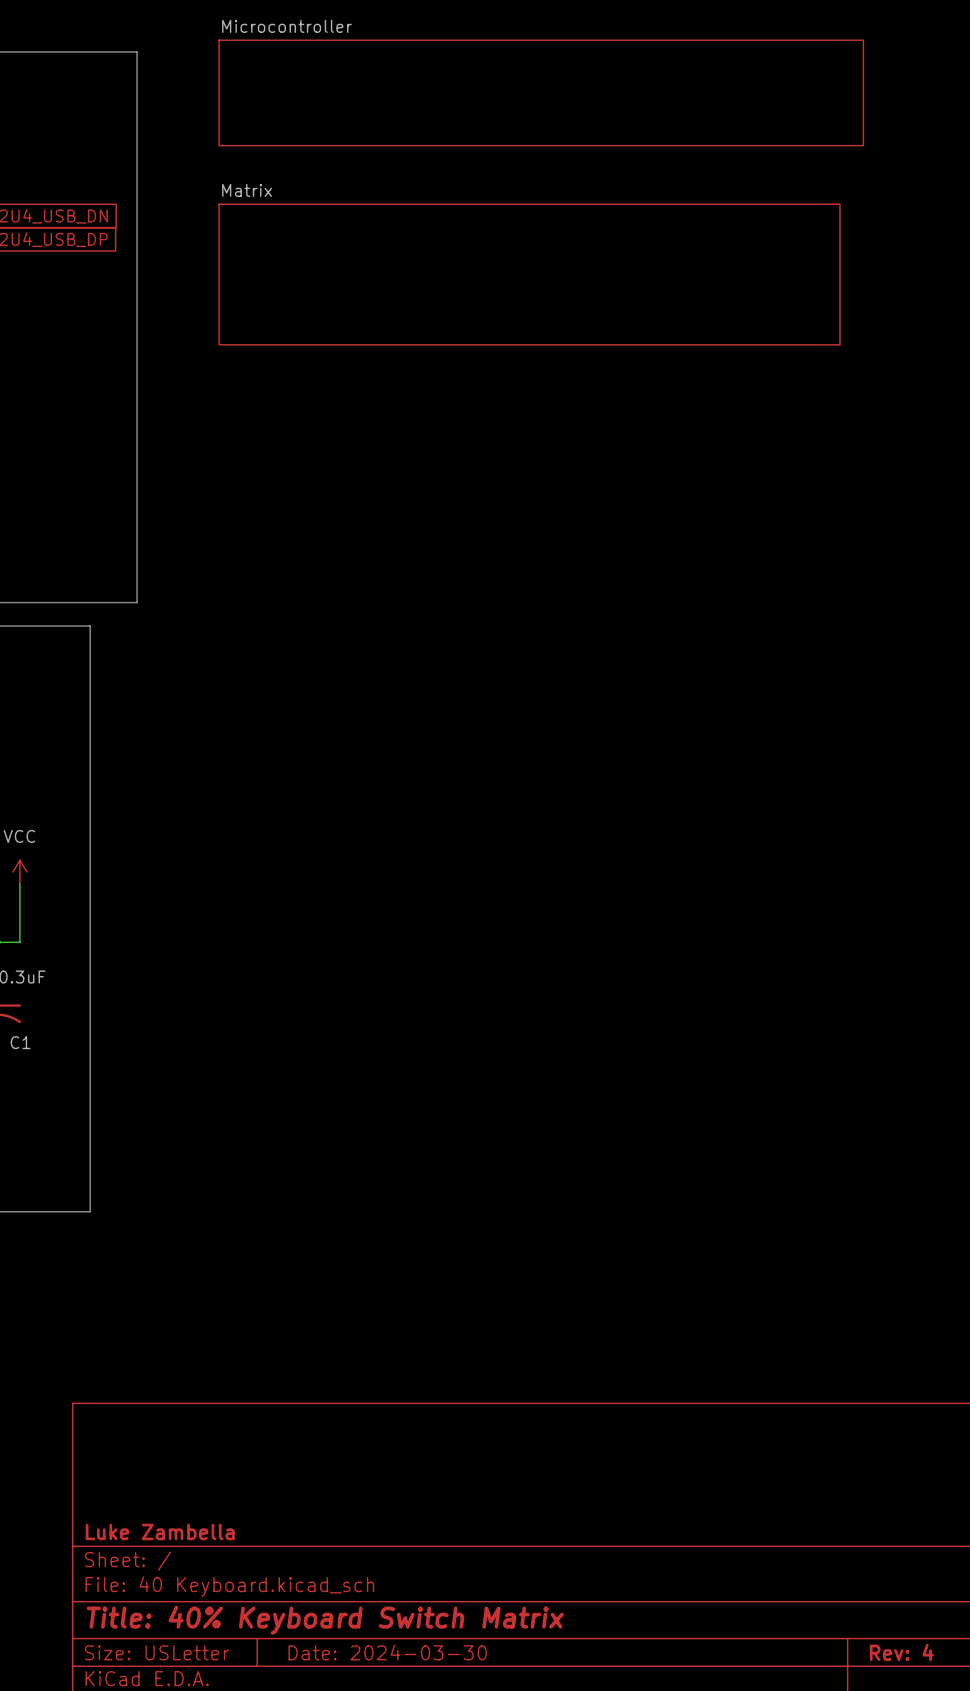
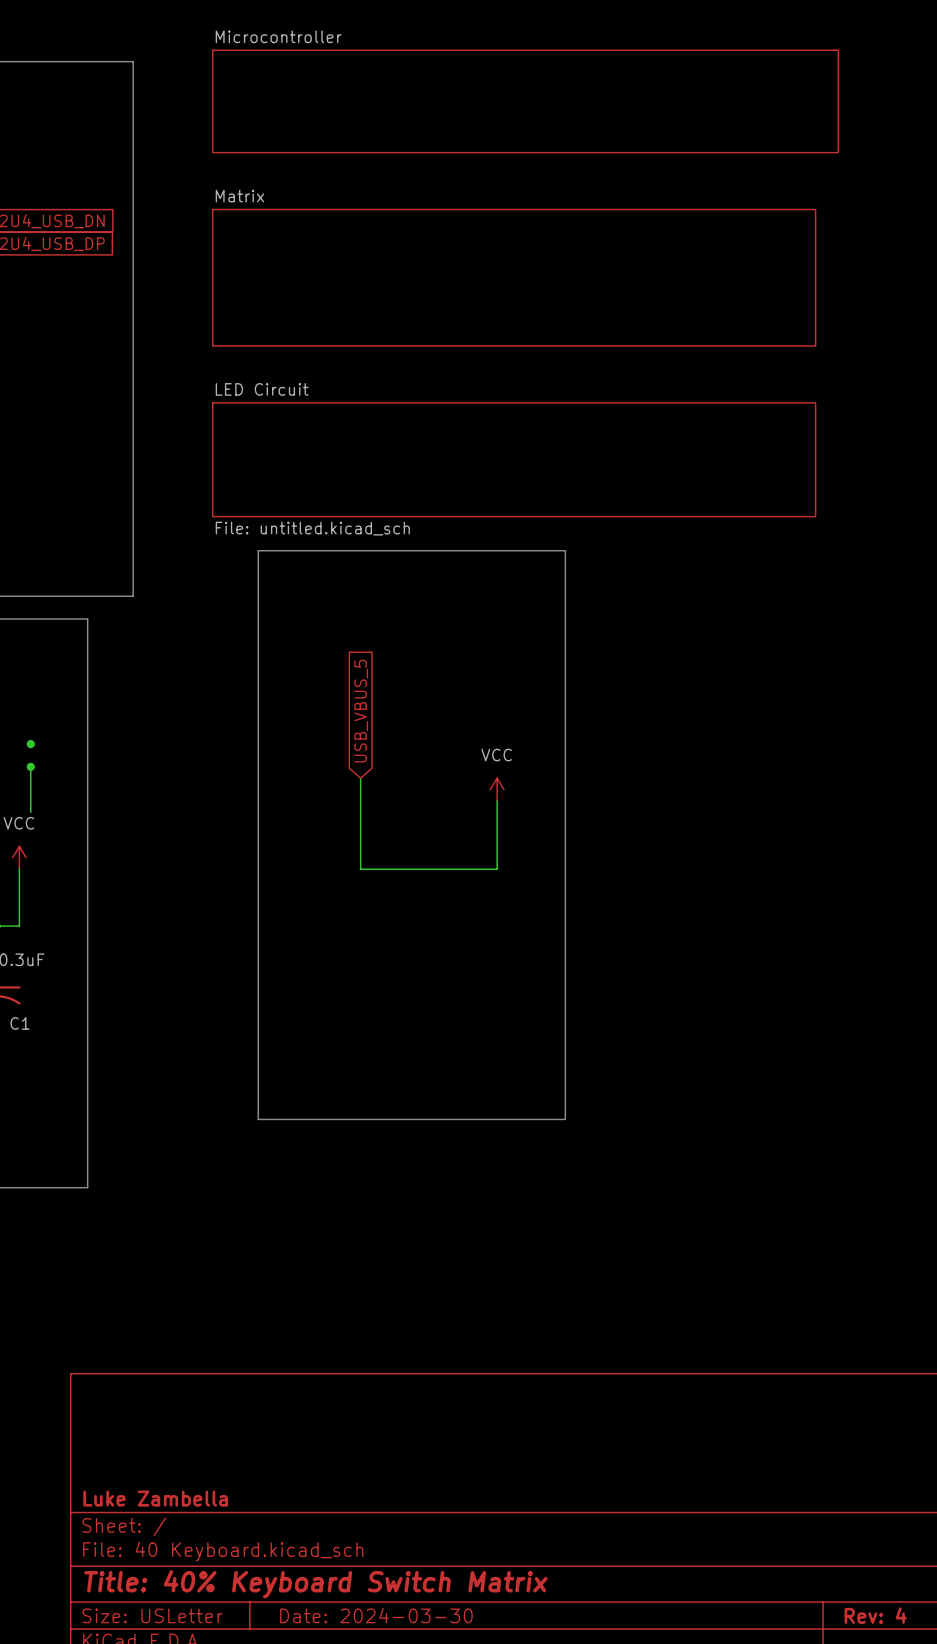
sheet LED Circuit: none -> File: untitled.kicad_sch (514, 459)
line: none -> (258, 550) (565, 550) (565, 1119) (258, 1119) (258, 550)
global label: none -> USB_VBUS_5 (361, 711)
junction: none -> (30, 744)
wire: none -> (30, 766) (30, 812)
junction: none -> (30, 766)
wire: none -> (360, 778) (360, 869) (497, 869) (497, 800)
power symbol: none -> VCC (497, 789)

